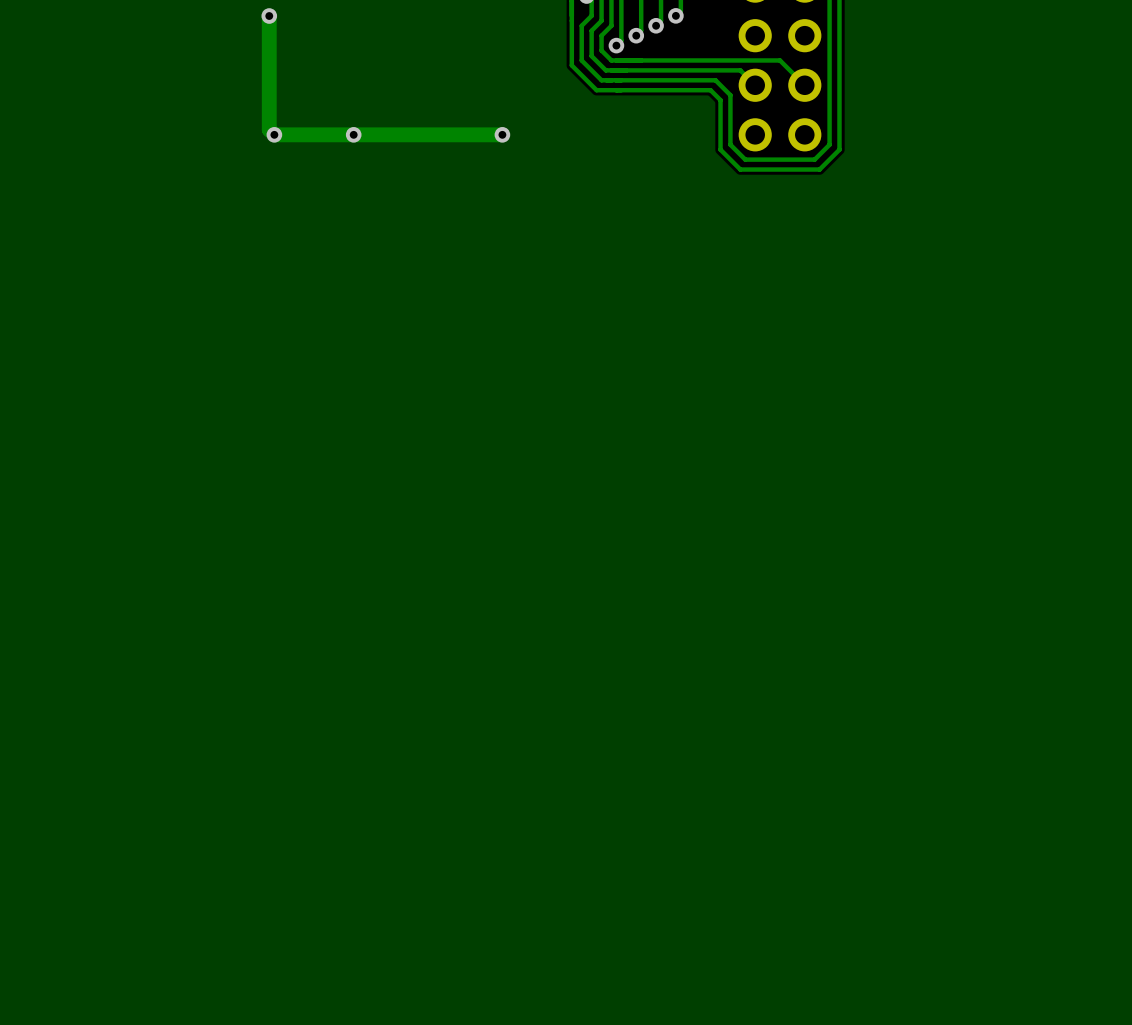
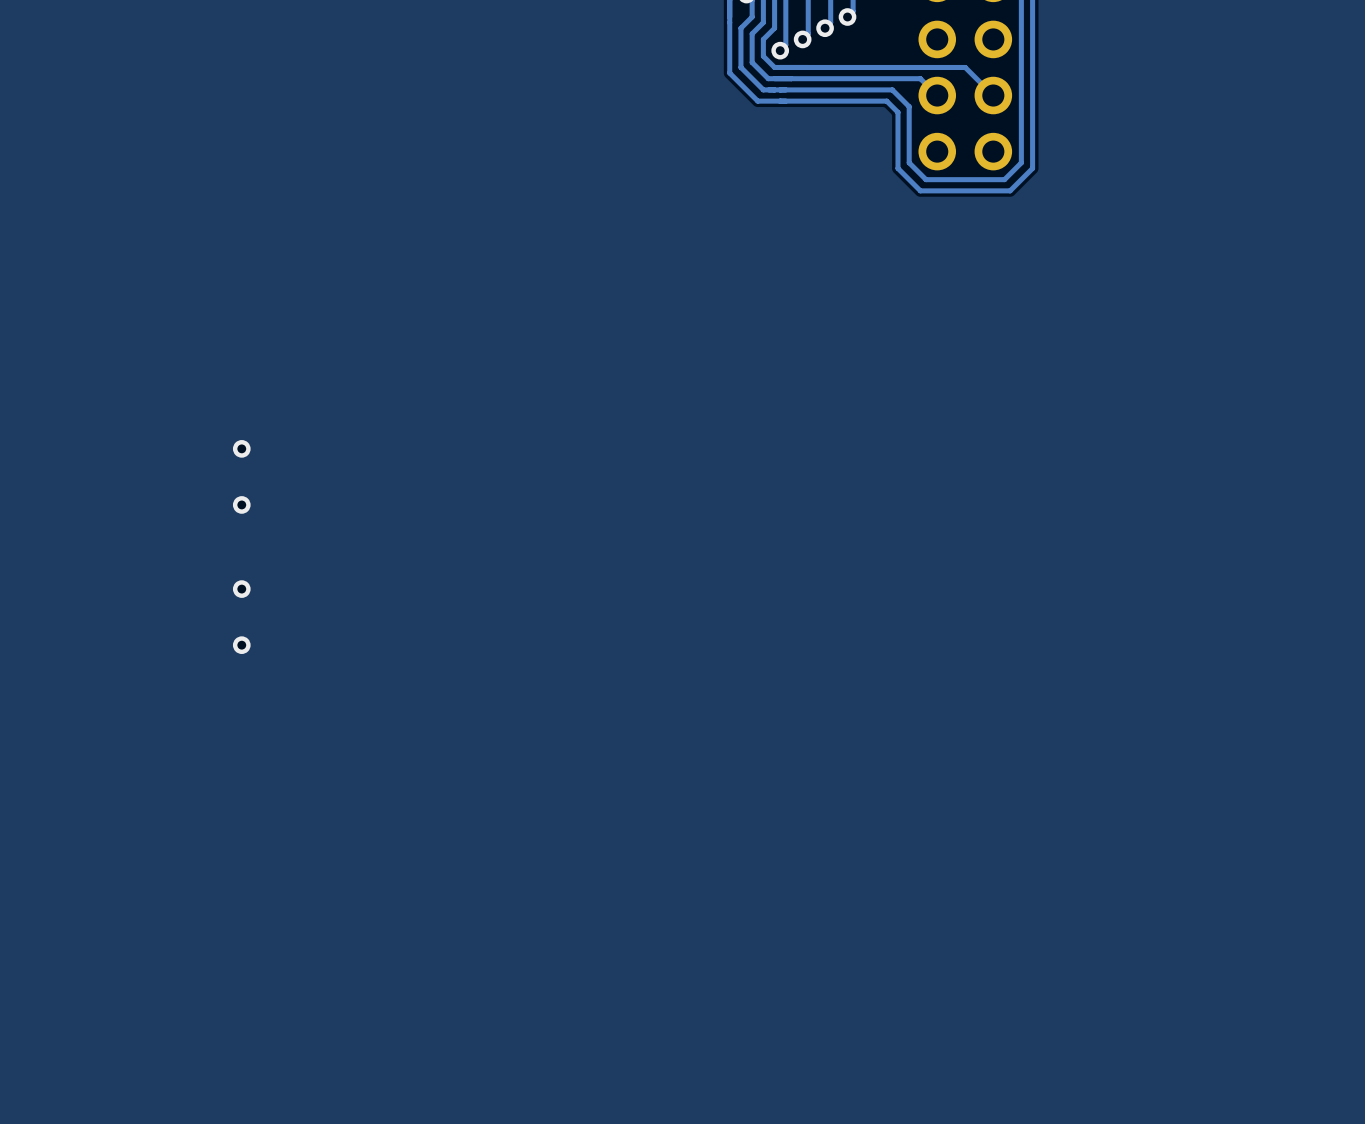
track: (269, 16) (269, 129) (274, 134) (502, 134) -> none
via: (269, 16) -> none
via: (274, 134) -> none
via: (353, 134) -> none
via: (502, 134) -> none
via: none -> (241, 448)
via: none -> (241, 504)
via: none -> (241, 589)
via: none -> (241, 645)

